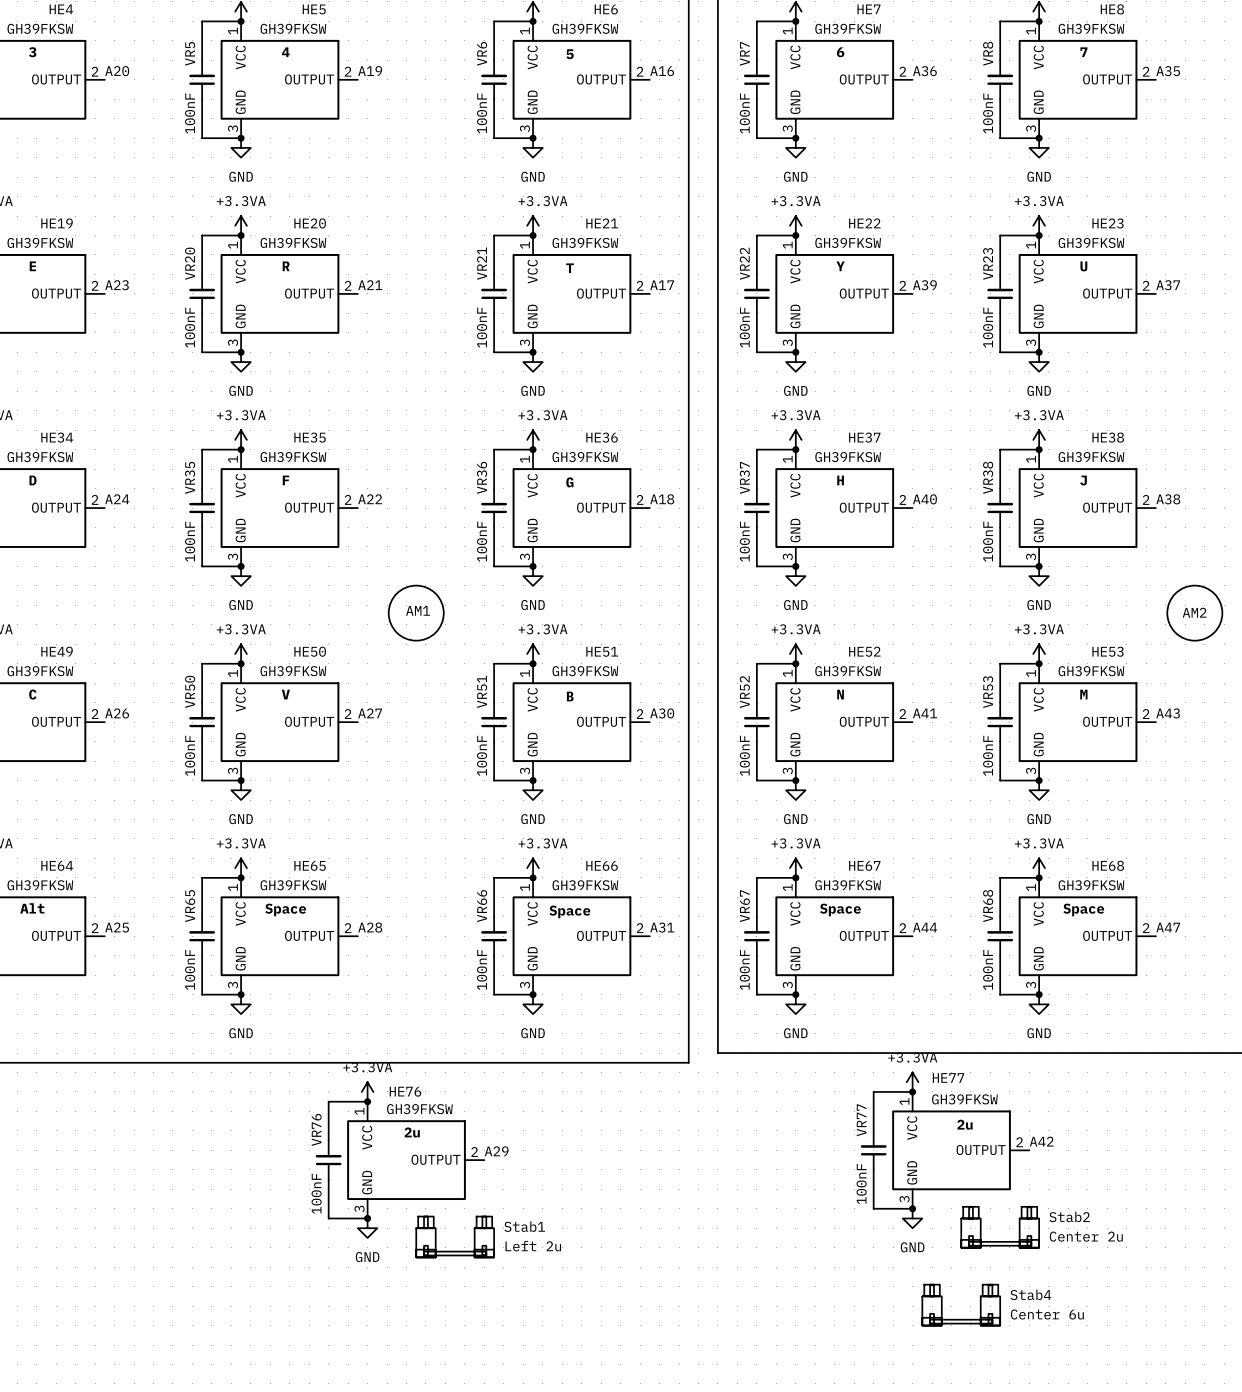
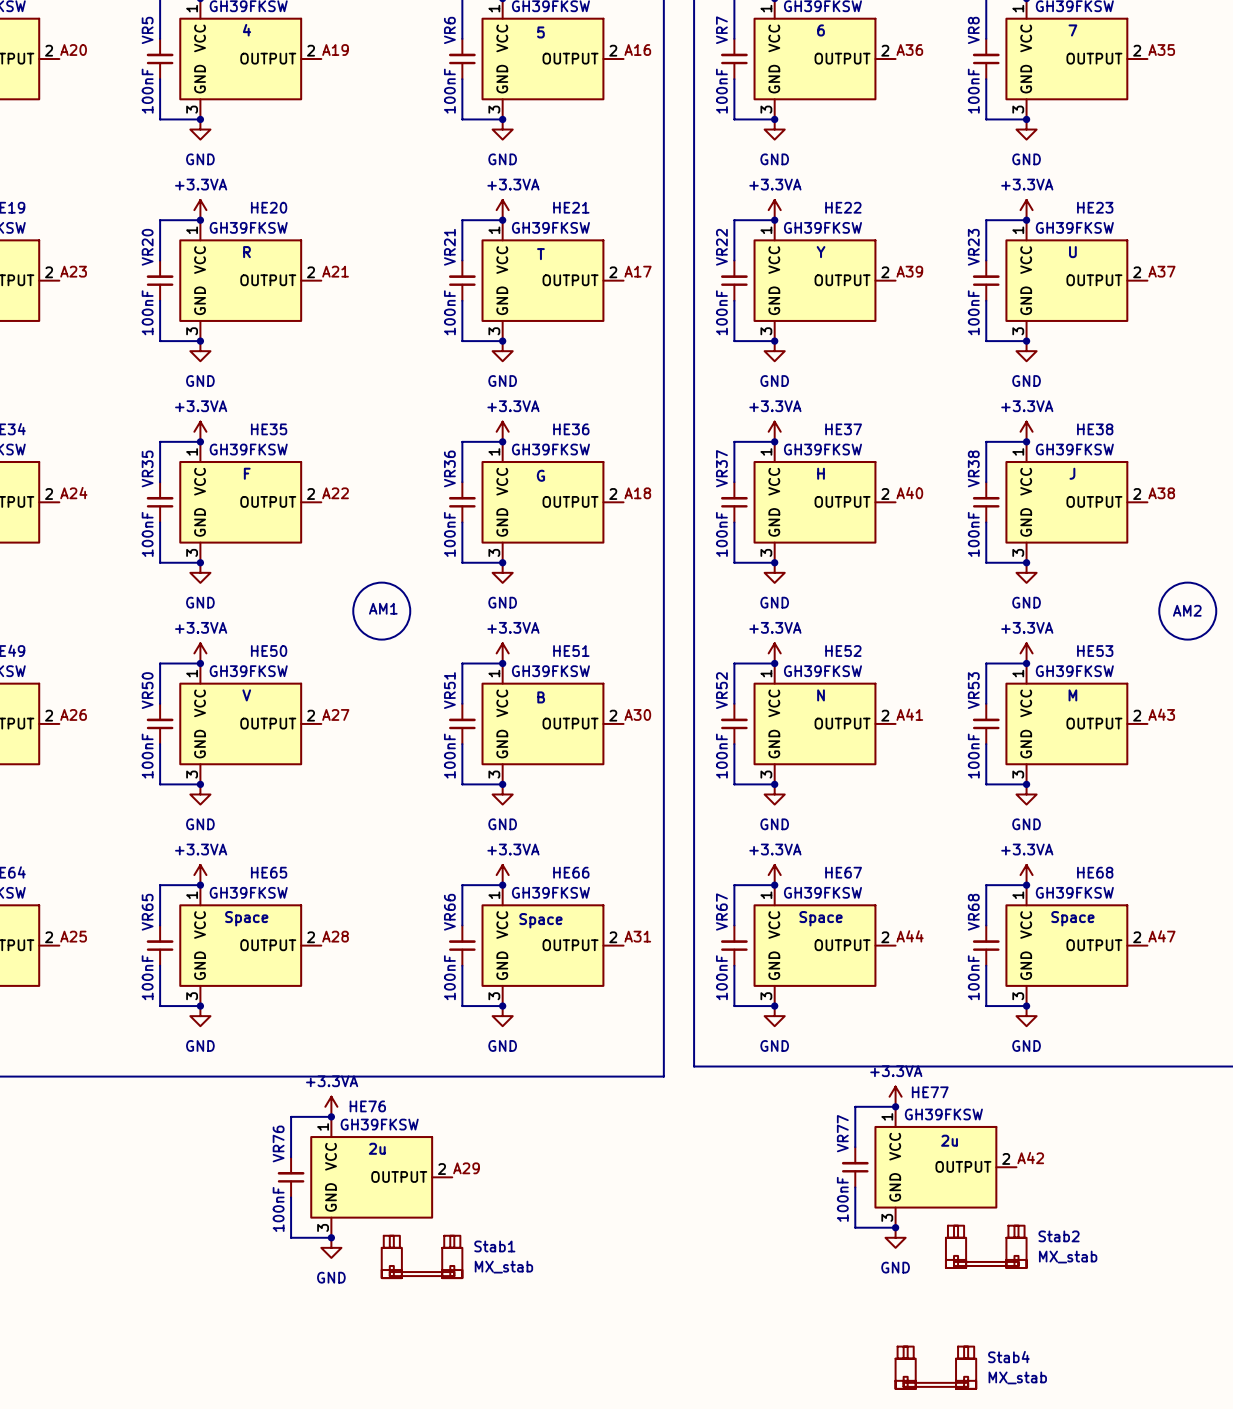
Stab2 value: Center 2u (1086, 1236) -> MX_stab (1068, 1257)
Stab1 value: Left 2u (533, 1246) -> MX_stab (503, 1267)
Stab4 position: (961, 1305) -> (935, 1367)
Stab4 value: Center 6u (1047, 1314) -> MX_stab (1017, 1377)

